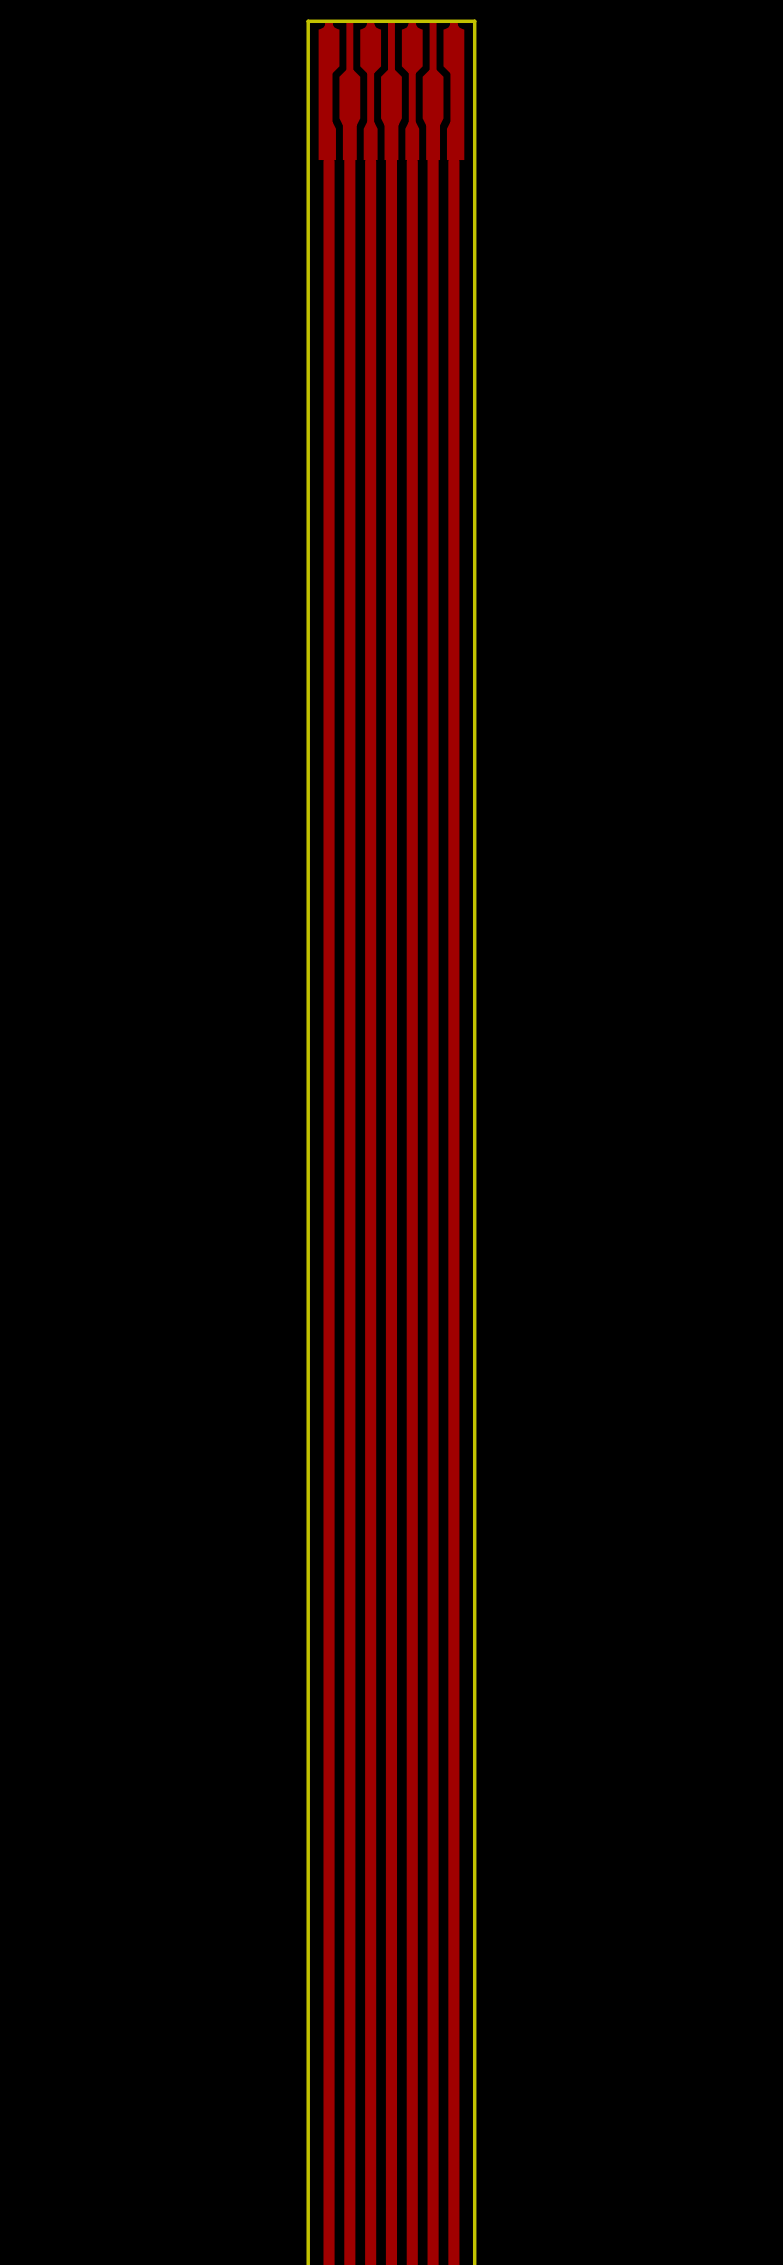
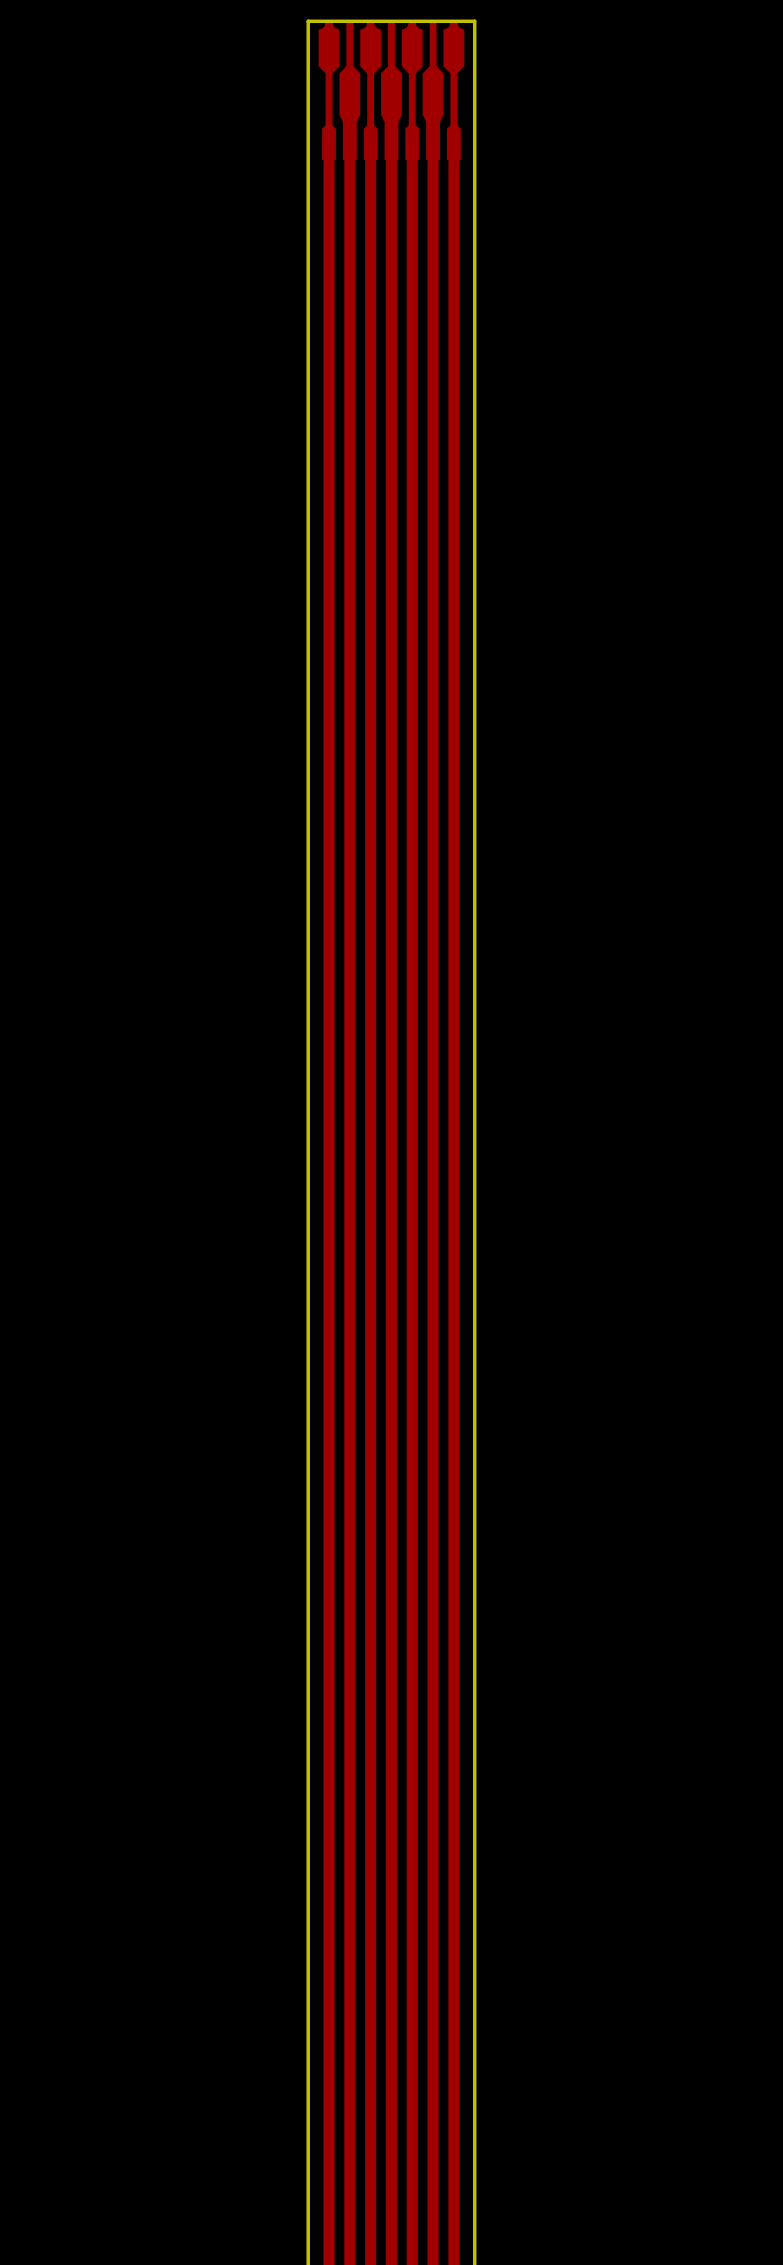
part footprint: [318, 21, 465, 161] -> [318, 21, 465, 161]

